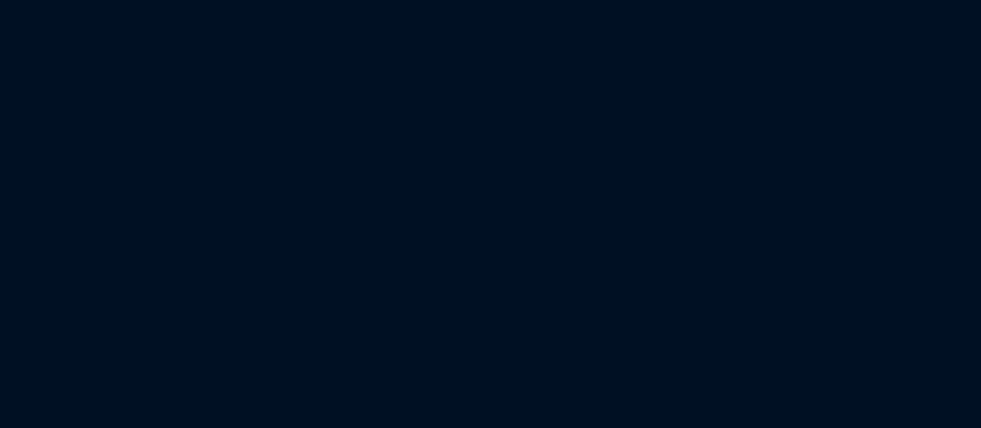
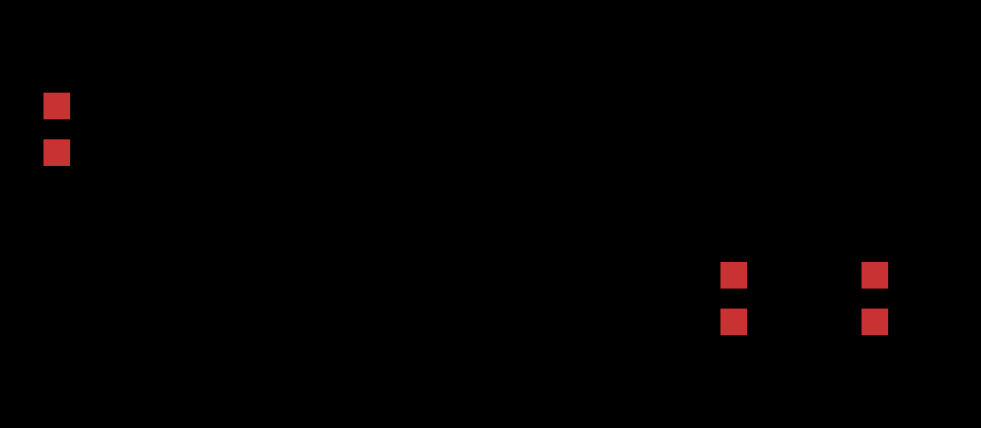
part: none -> (56, 129)
part: none -> (733, 298)
part: none -> (874, 298)

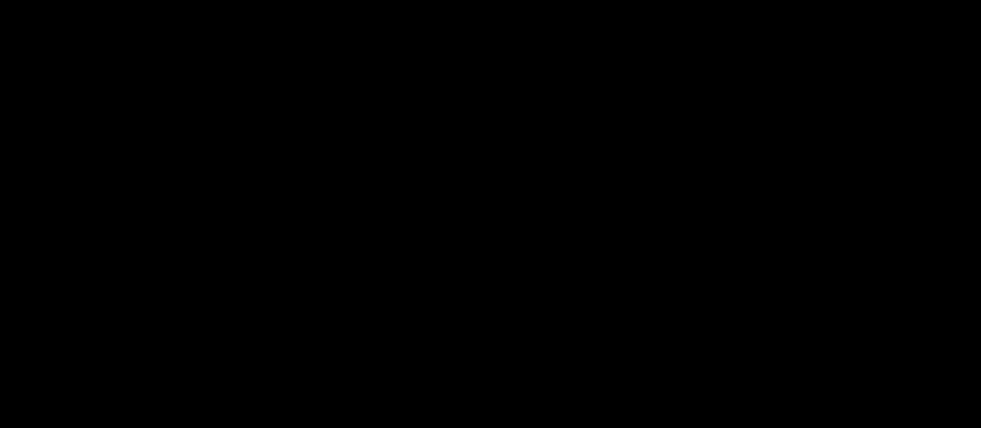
part: (56, 129) -> none
part: (733, 298) -> none
part: (874, 298) -> none

